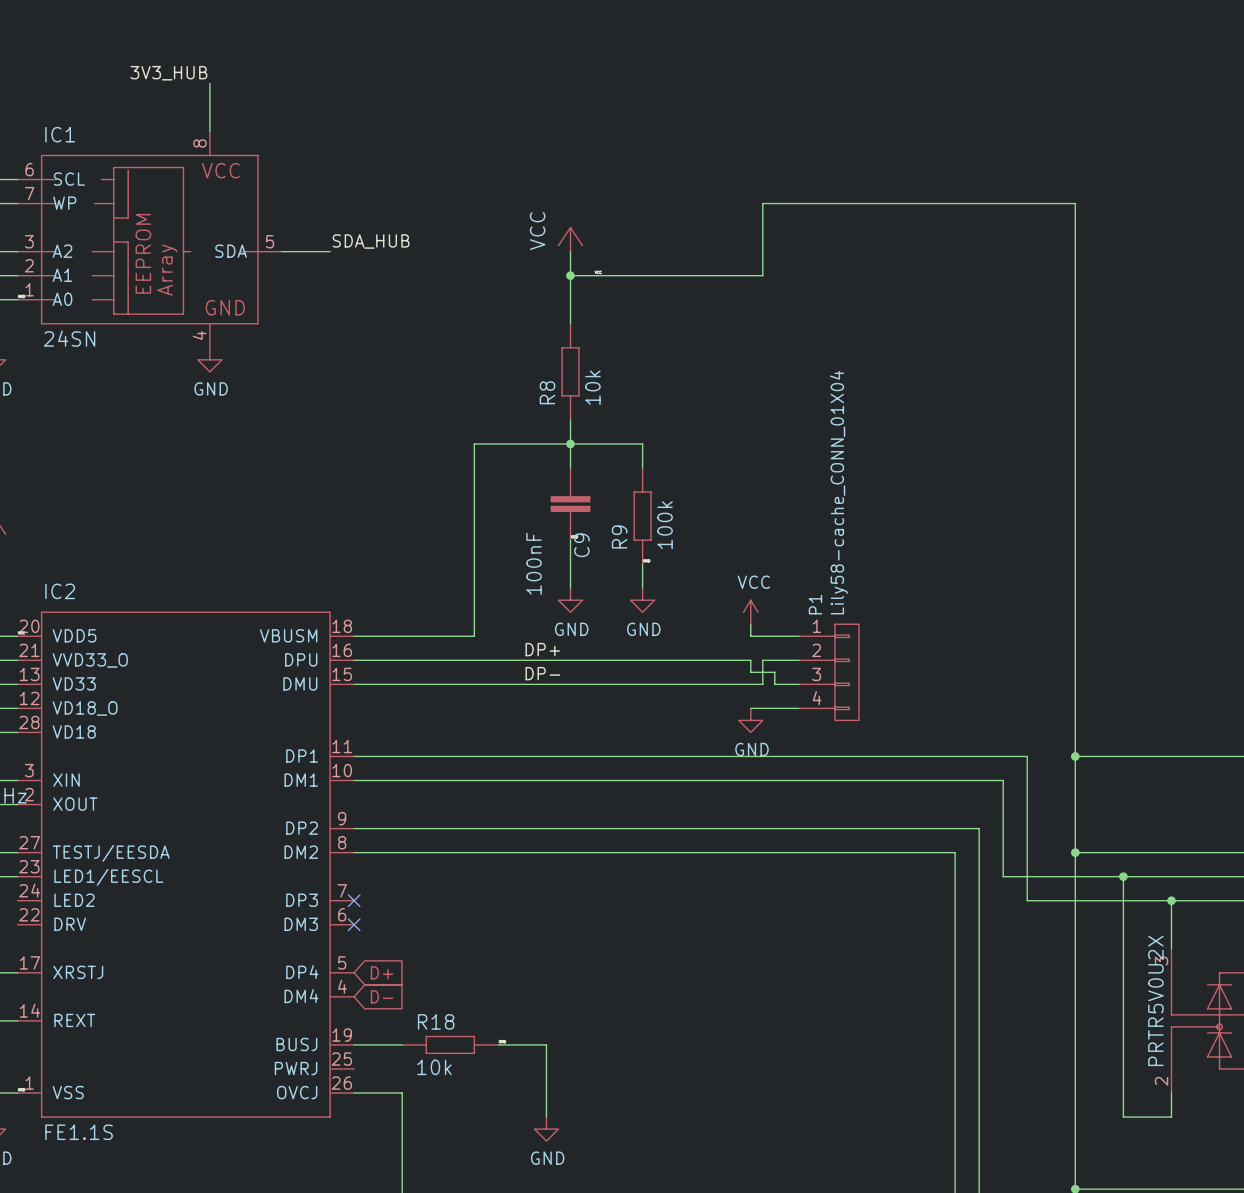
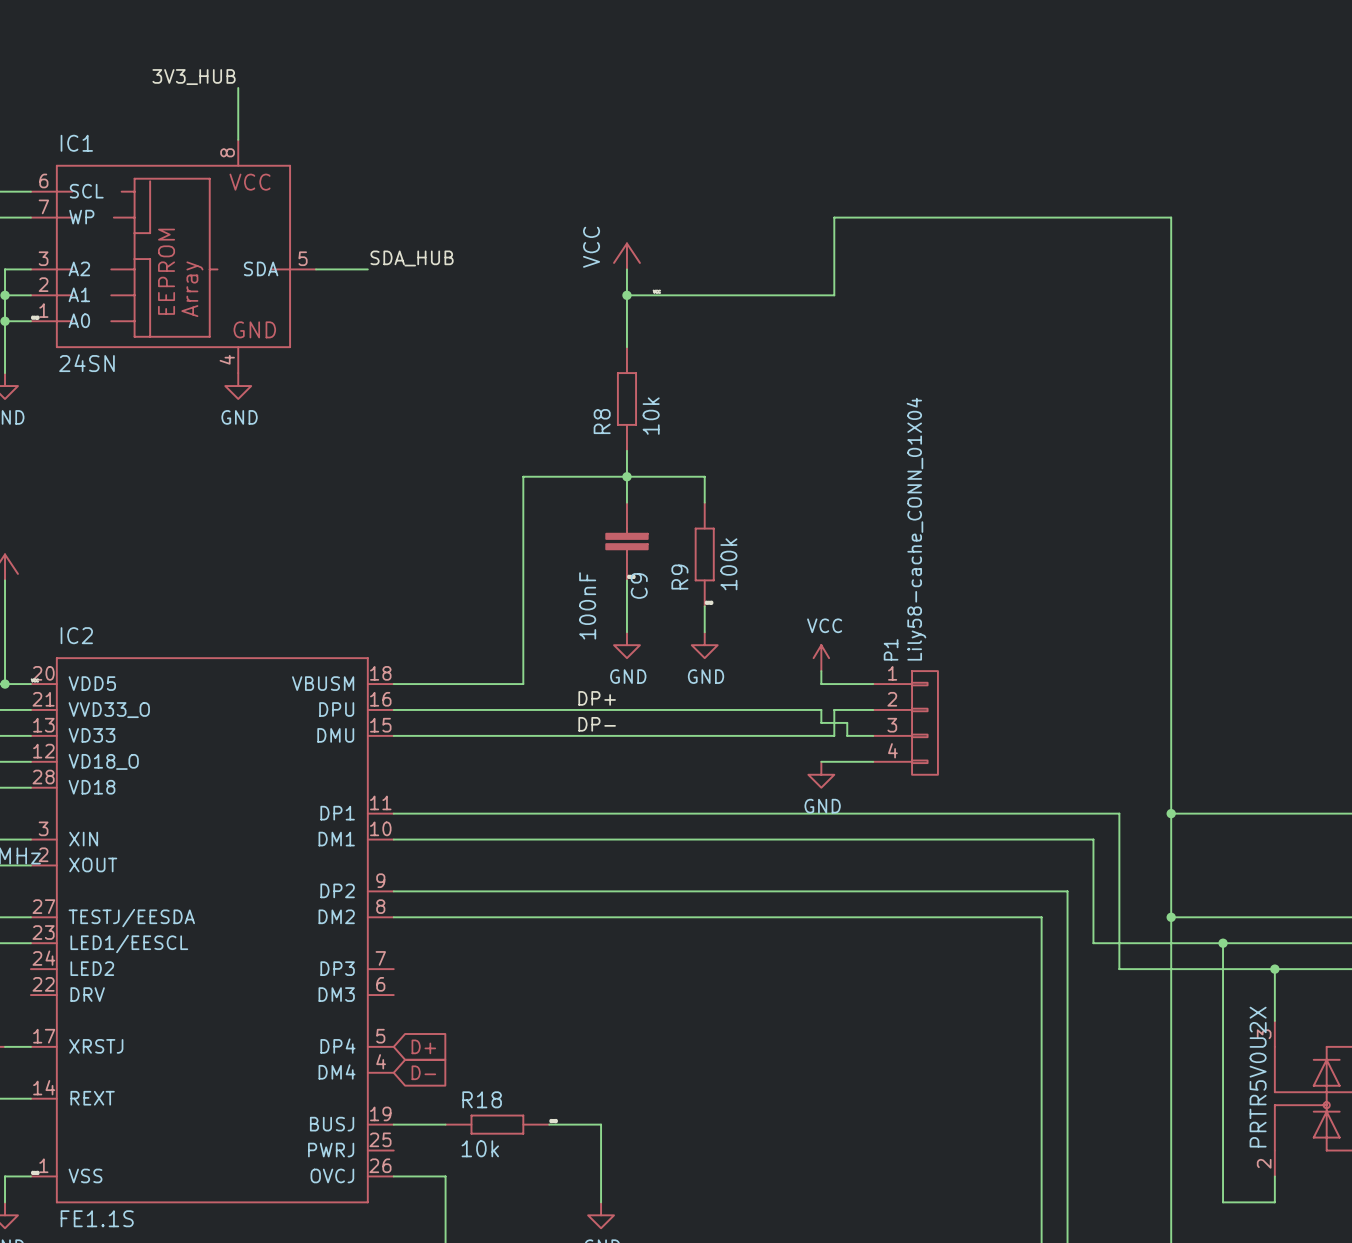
no-connect mark: (354, 900) -> none
no-connect mark: (354, 924) -> none

